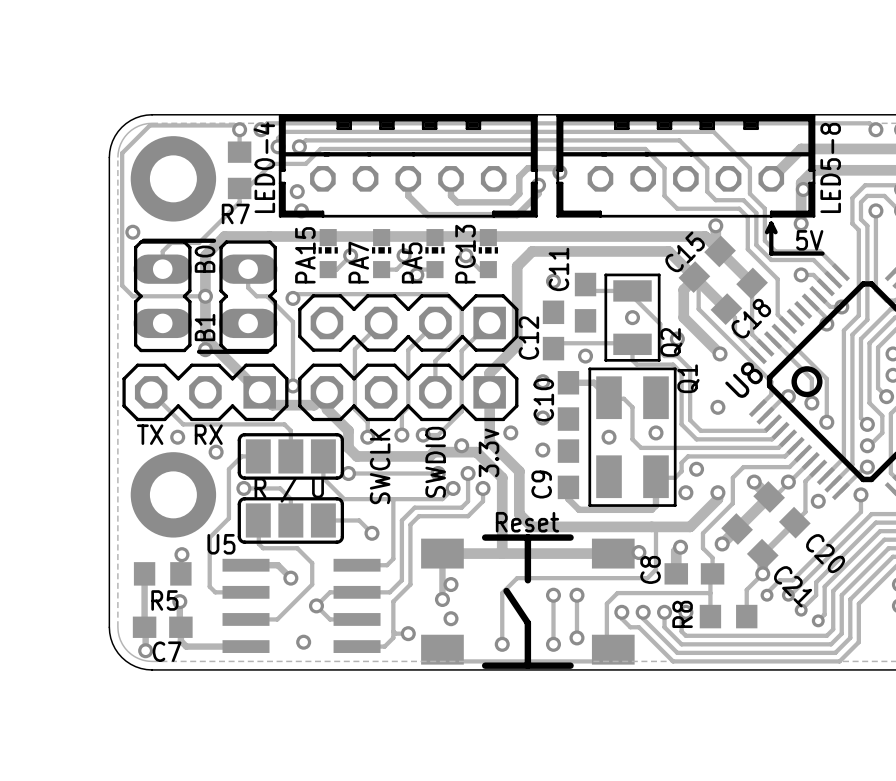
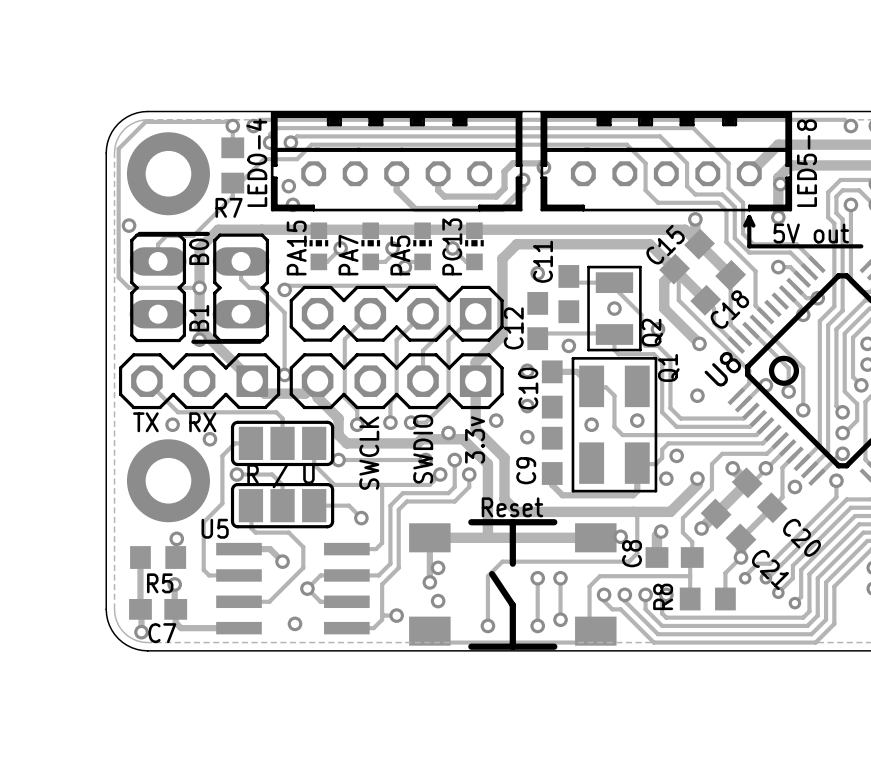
text: 5V (809, 240) -> 5V out (811, 233)
line: none -> (799, 246) (861, 246)

